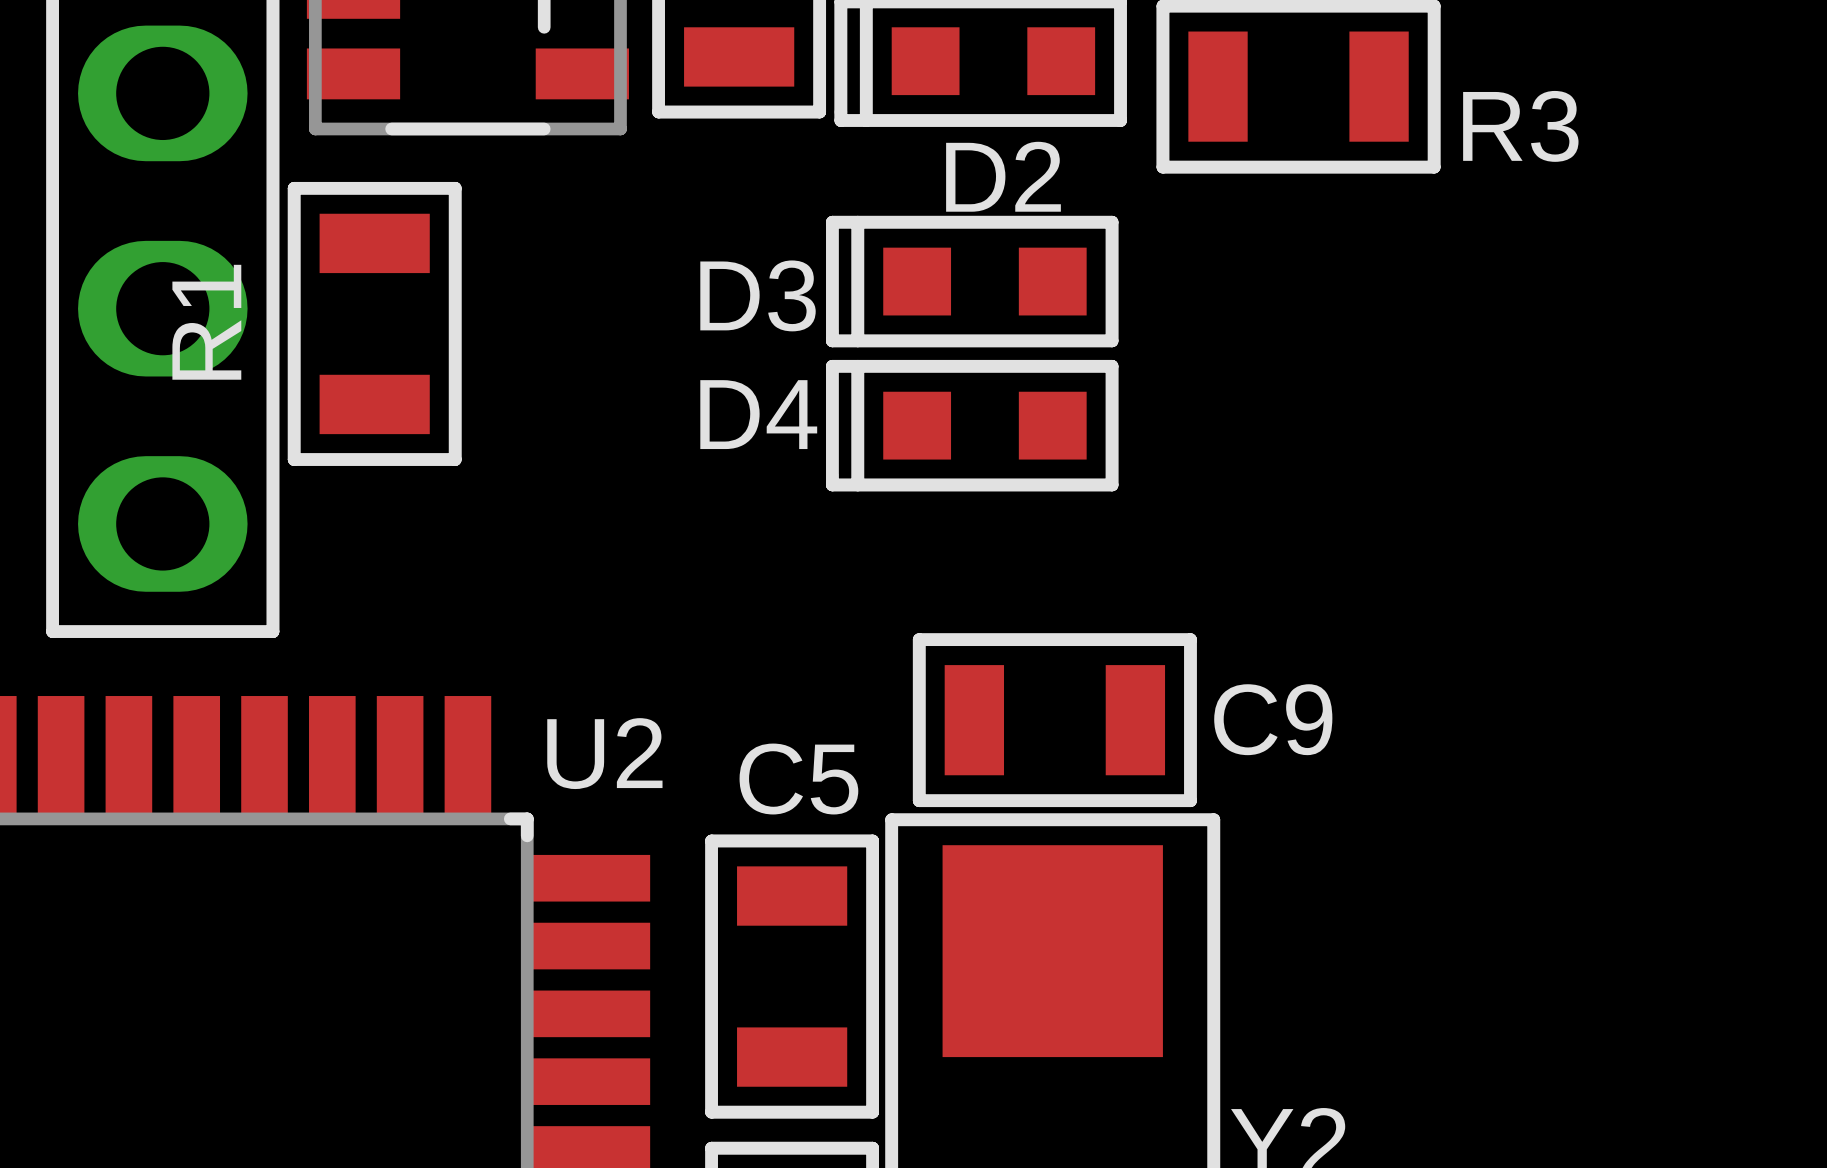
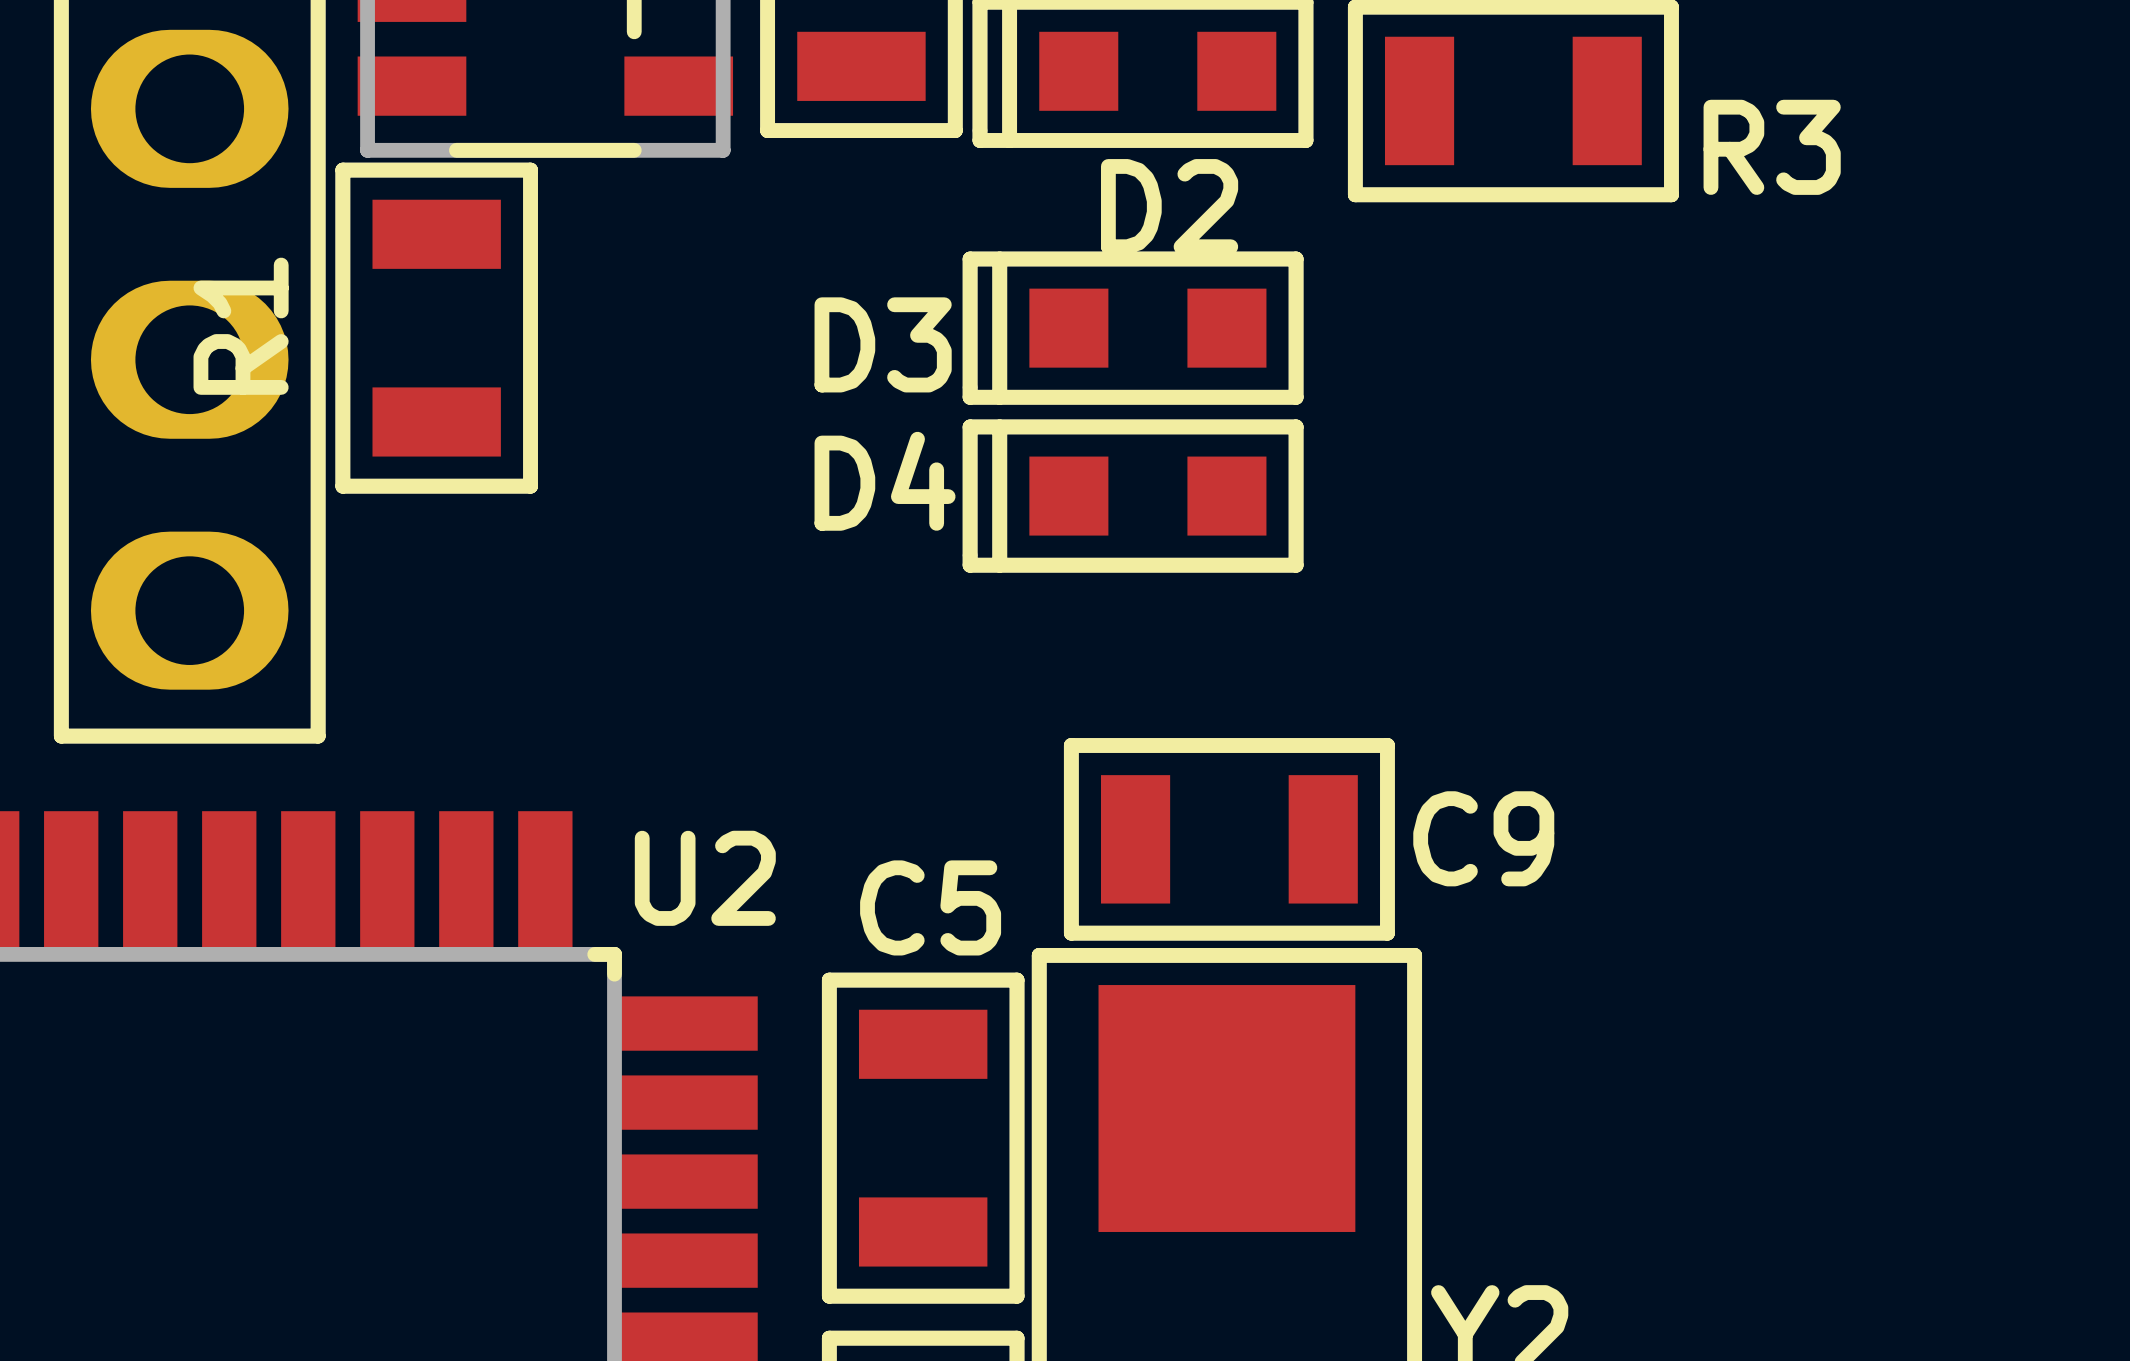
R1 position: (374, 323) -> (436, 328)

